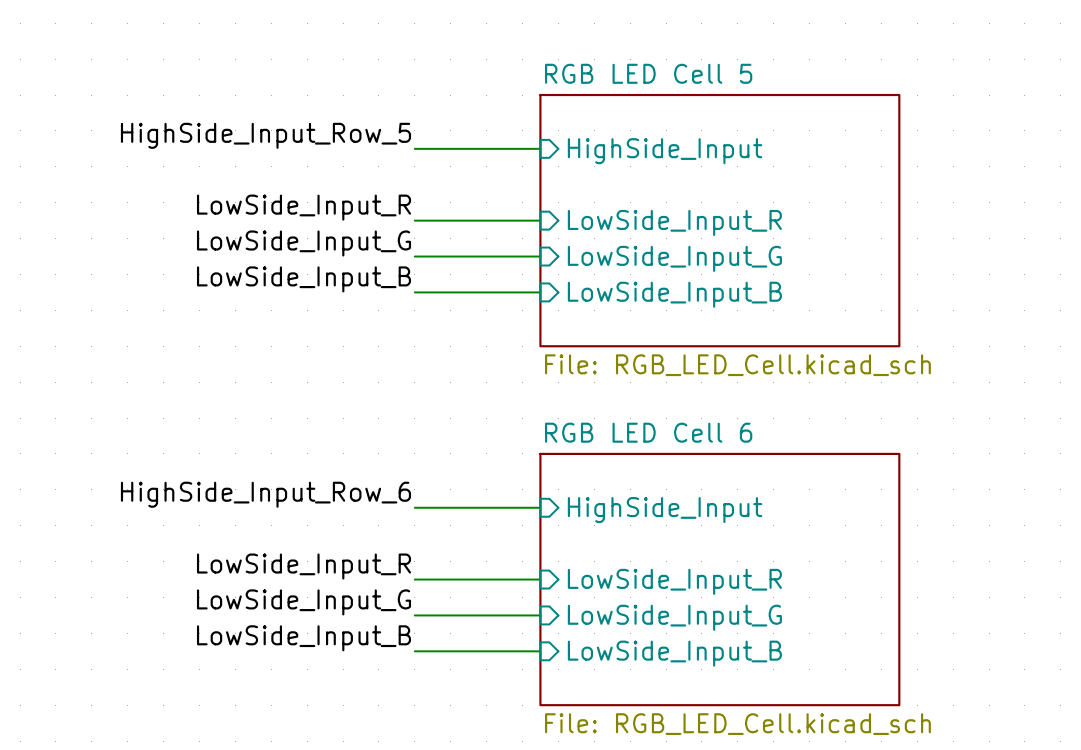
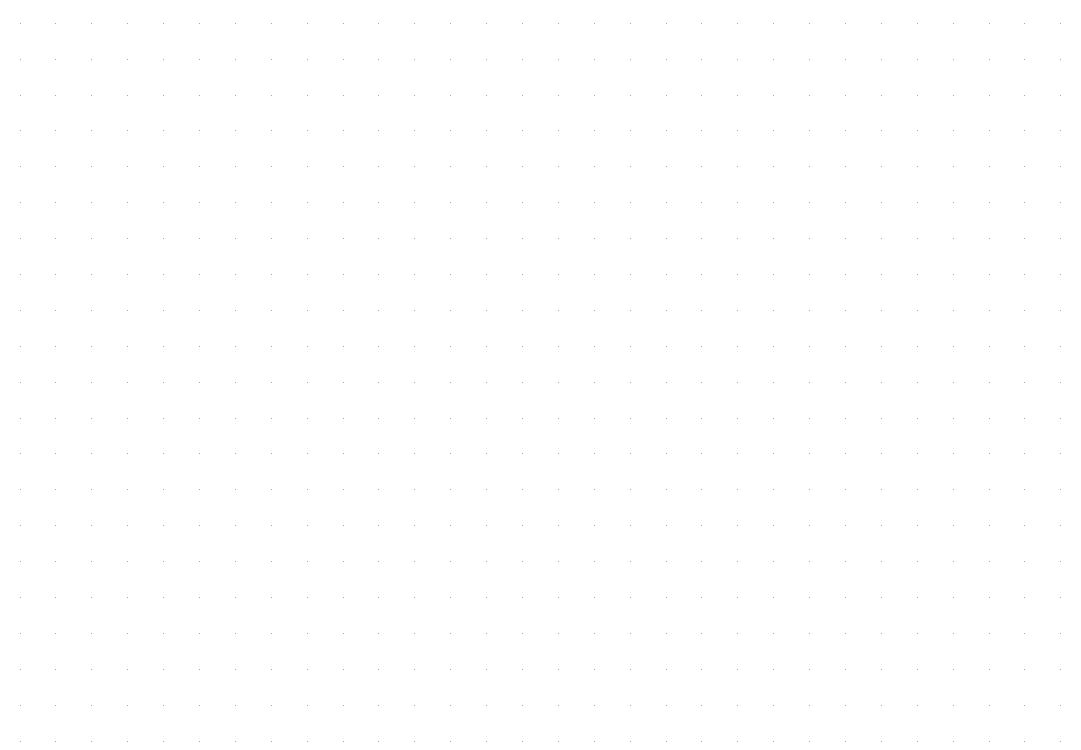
label: HighSide_Input_Row_5 (265, 135) -> none
wire: (414, 148) (540, 148) -> none
sheet pin: HighSide_Input (665, 151) -> none
label: LowSide_Input_R (304, 207) -> none
wire: (414, 220) (540, 220) -> none
sheet RGB LED Cell 5: File: RGB_LED_Cell.kicad_sch (719, 220) -> none
sheet pin: LowSide_Input_R (674, 222) -> none
label: LowSide_Input_G (304, 243) -> none
wire: (414, 256) (540, 256) -> none
sheet pin: LowSide_Input_G (674, 258) -> none
label: LowSide_Input_B (304, 279) -> none
wire: (414, 292) (540, 292) -> none
sheet pin: LowSide_Input_B (674, 294) -> none
label: HighSide_Input_Row_6 (265, 494) -> none
wire: (414, 507) (540, 507) -> none
sheet pin: HighSide_Input (665, 510) -> none
label: LowSide_Input_R (304, 566) -> none
wire: (414, 579) (540, 579) -> none
sheet RGB LED Cell 6: File: RGB_LED_Cell.kicad_sch (719, 579) -> none
sheet pin: LowSide_Input_R (674, 581) -> none
label: LowSide_Input_G (304, 602) -> none
wire: (414, 615) (540, 615) -> none
sheet pin: LowSide_Input_G (674, 617) -> none
label: LowSide_Input_B (304, 638) -> none
wire: (414, 651) (540, 651) -> none
sheet pin: LowSide_Input_B (674, 653) -> none

